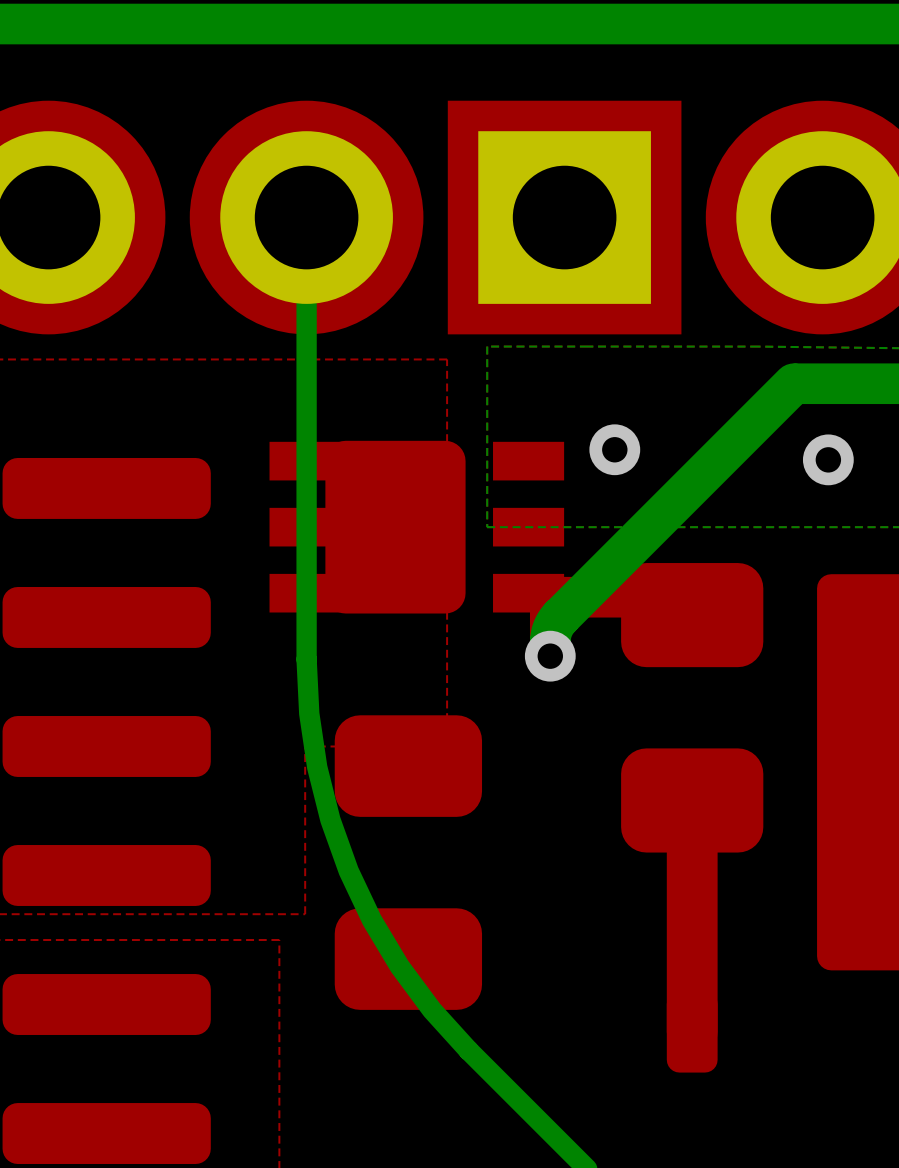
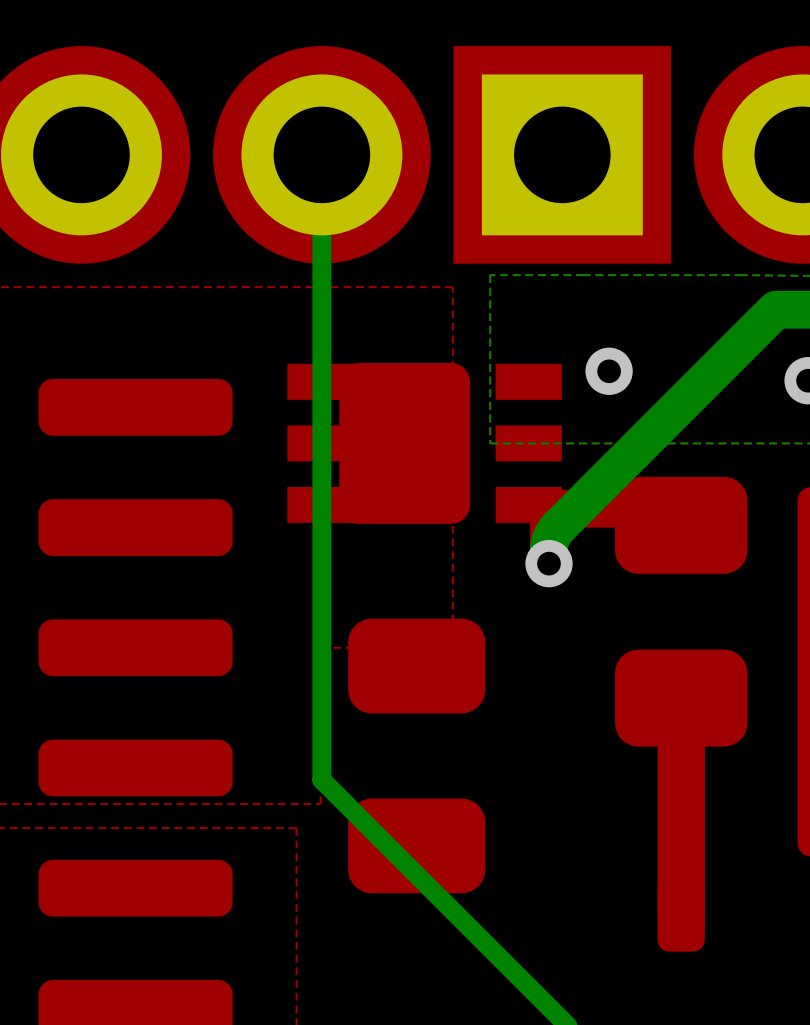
bottom track: (306, 659) (309, 713) (317, 767) (330, 819) (348, 870) (371, 920) (399, 966) (432, 1010) (468, 1050) -> (321, 566) (321, 780) (472, 930)

